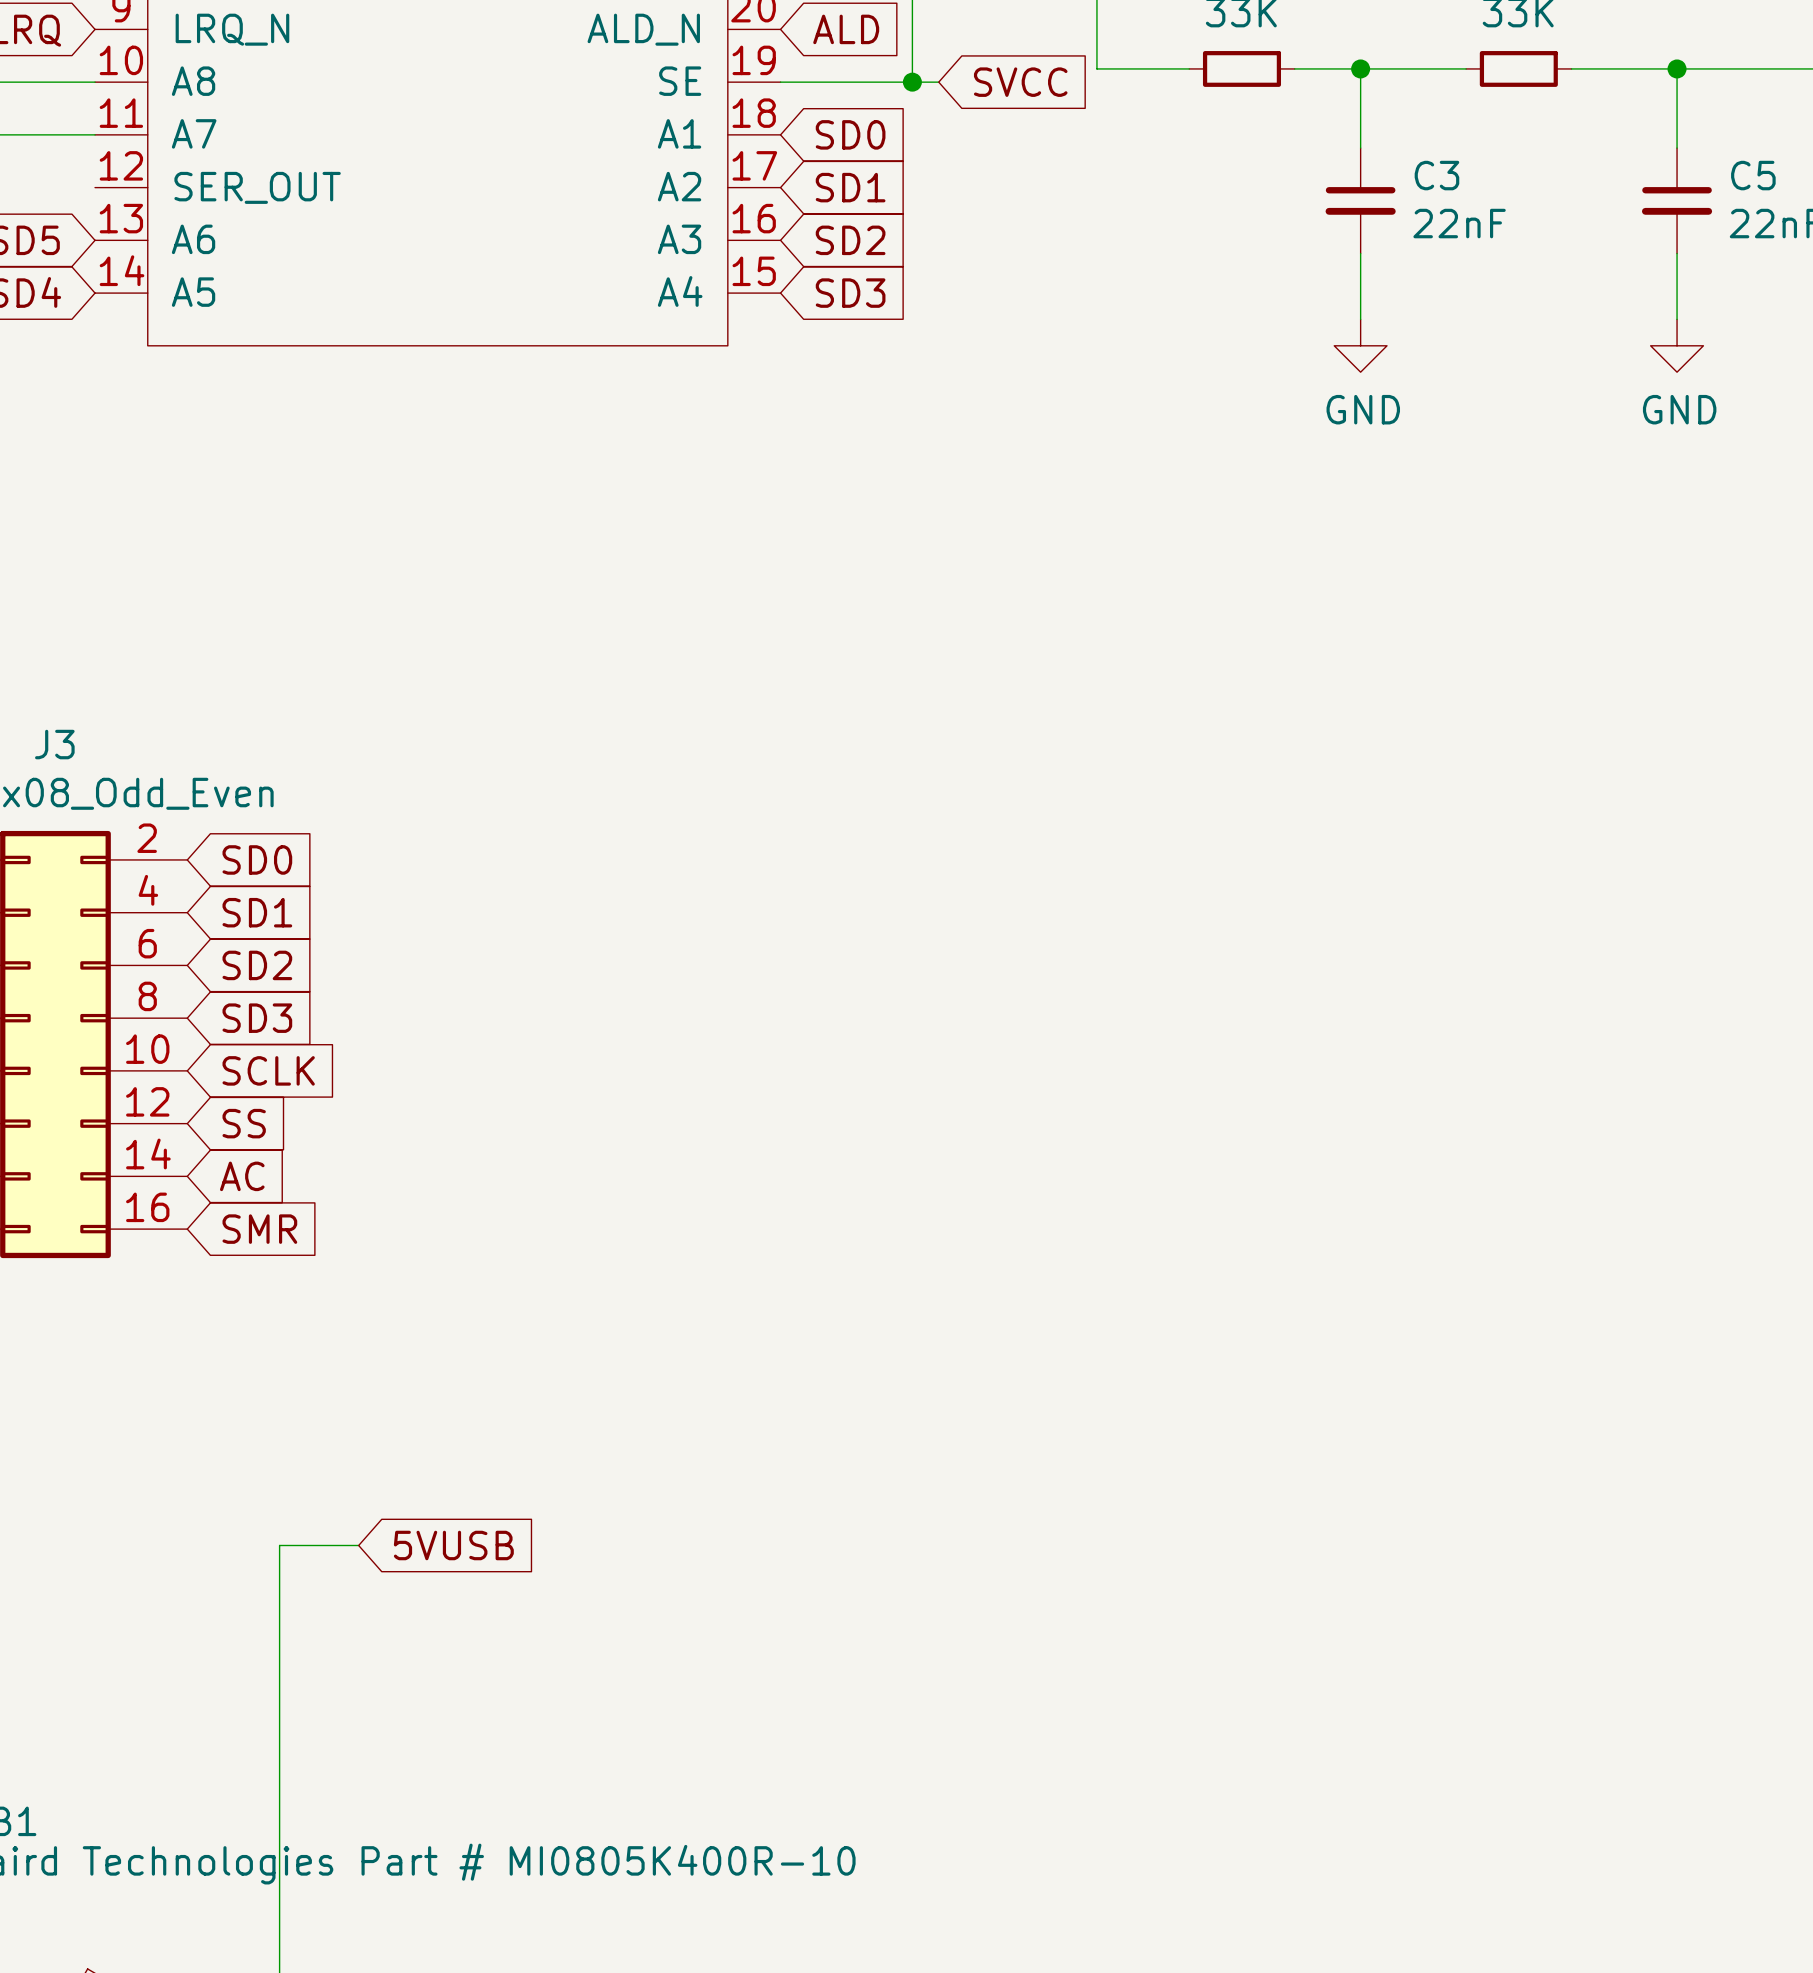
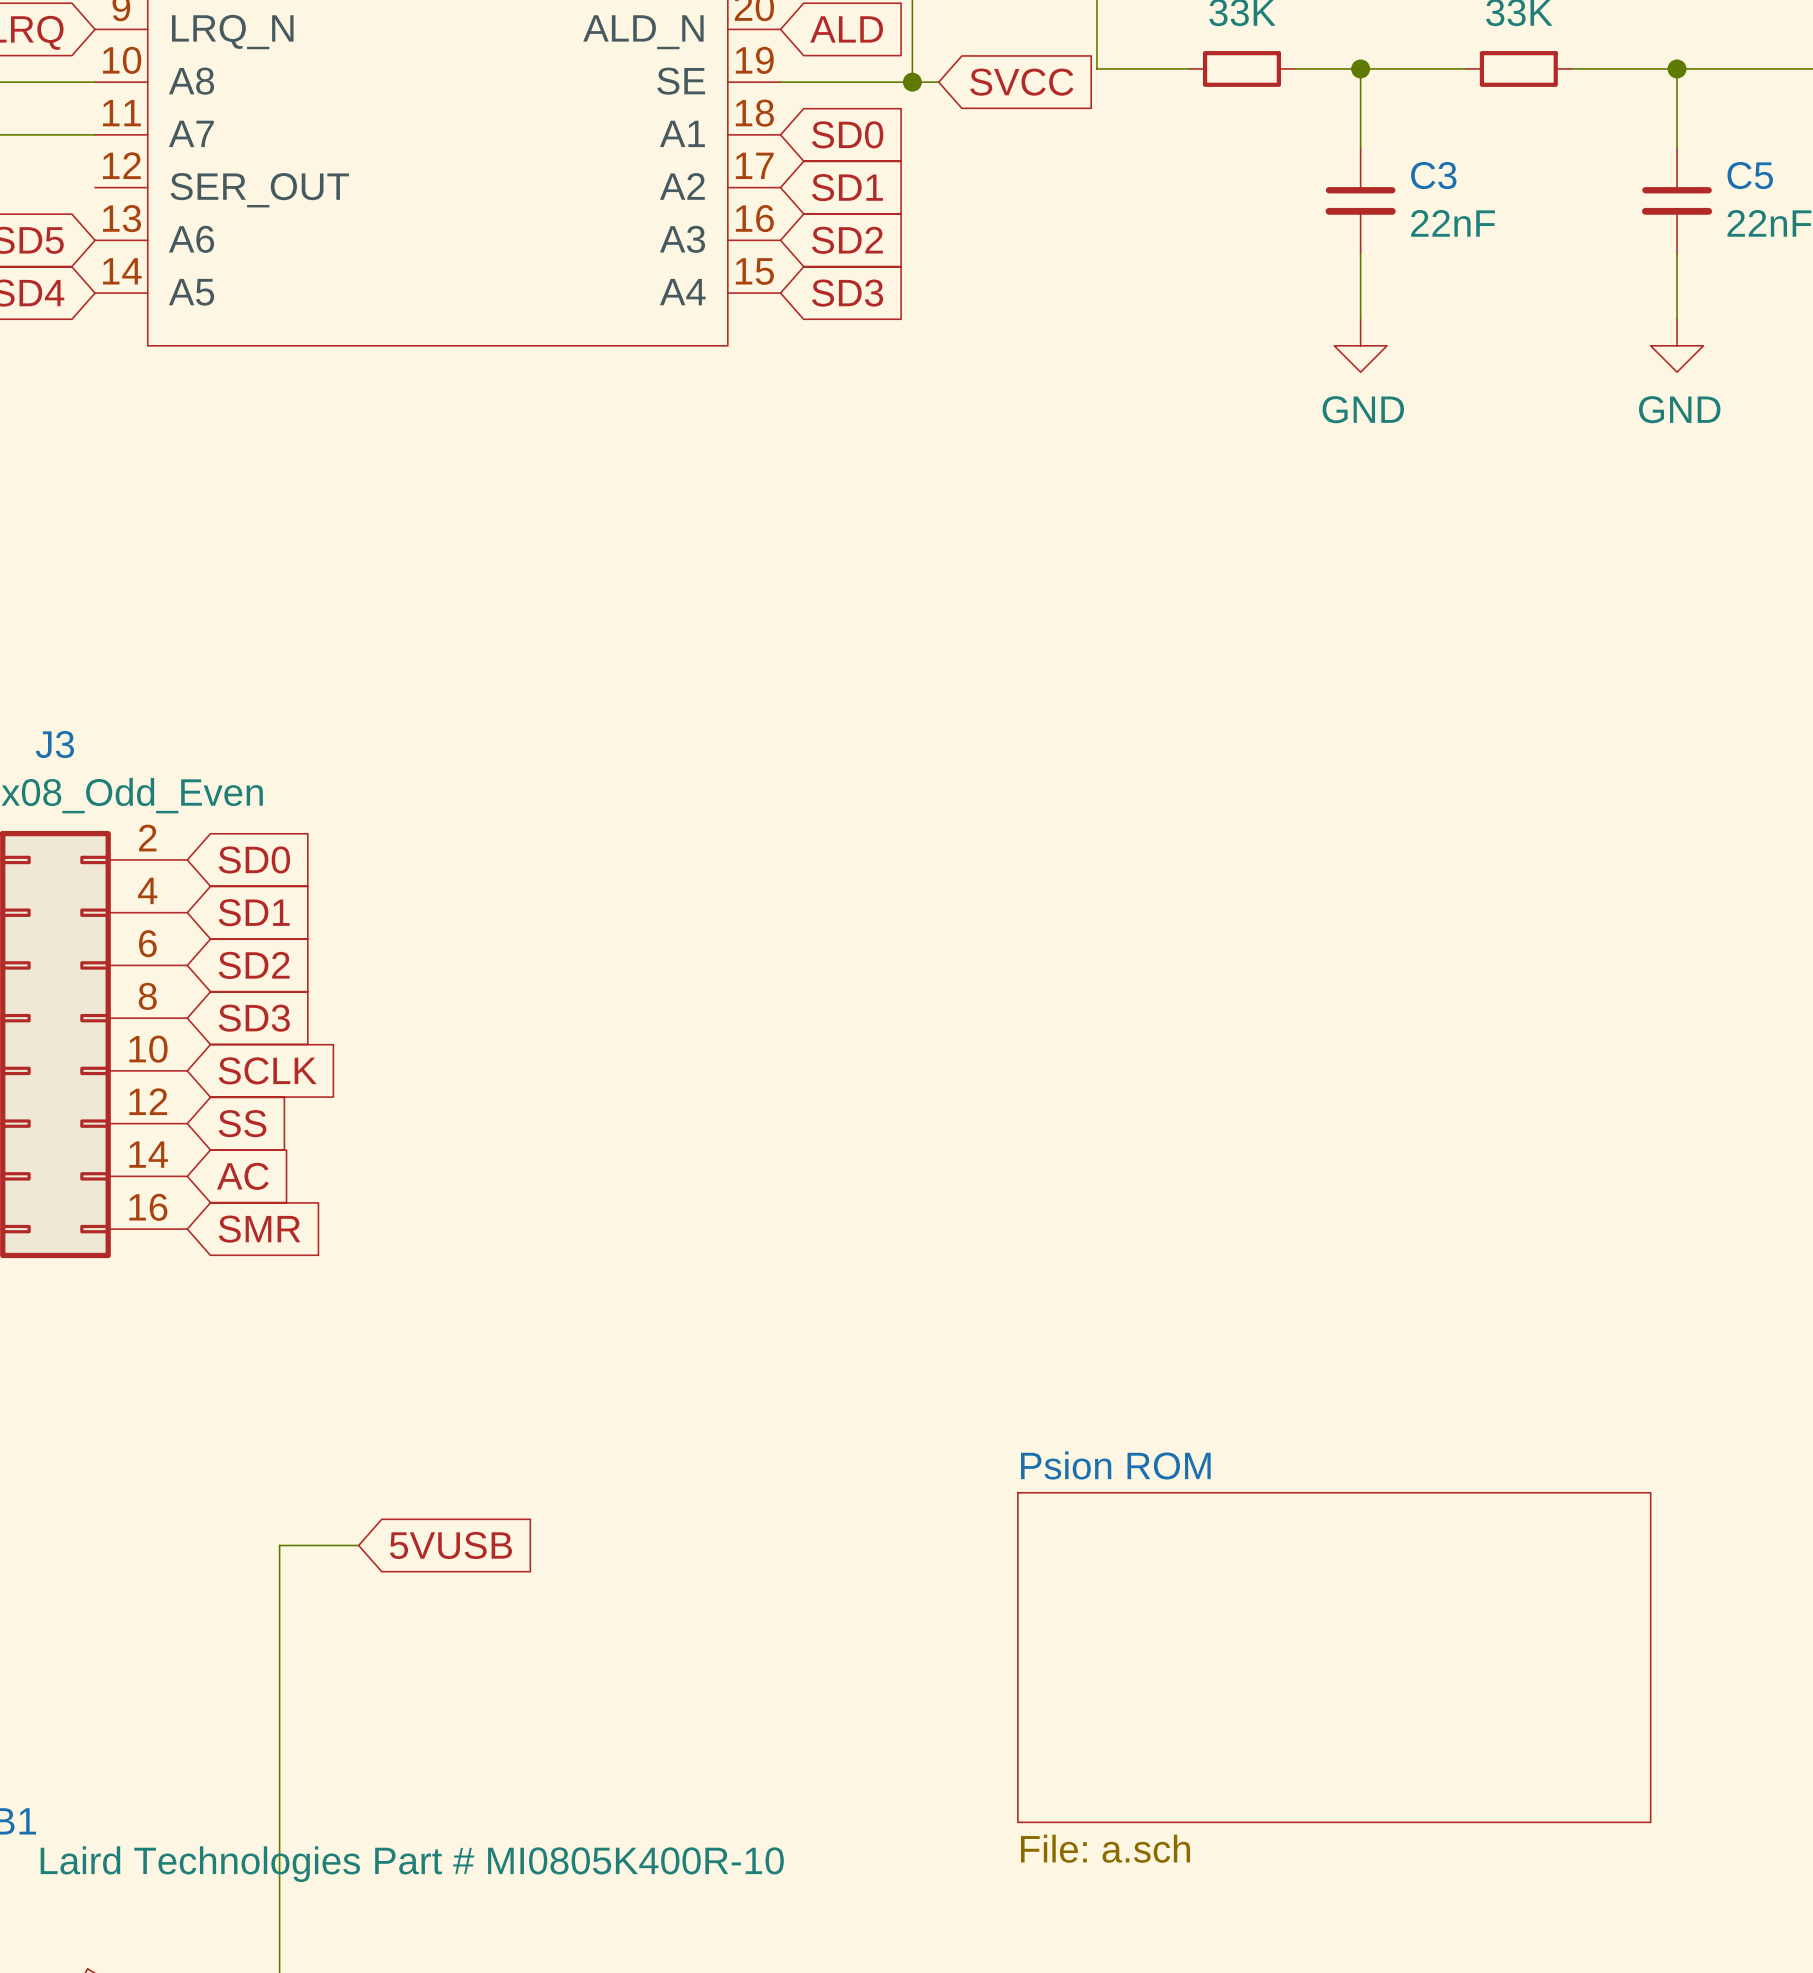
sheet Psion ROM: none -> File: a.sch (1334, 1657)

